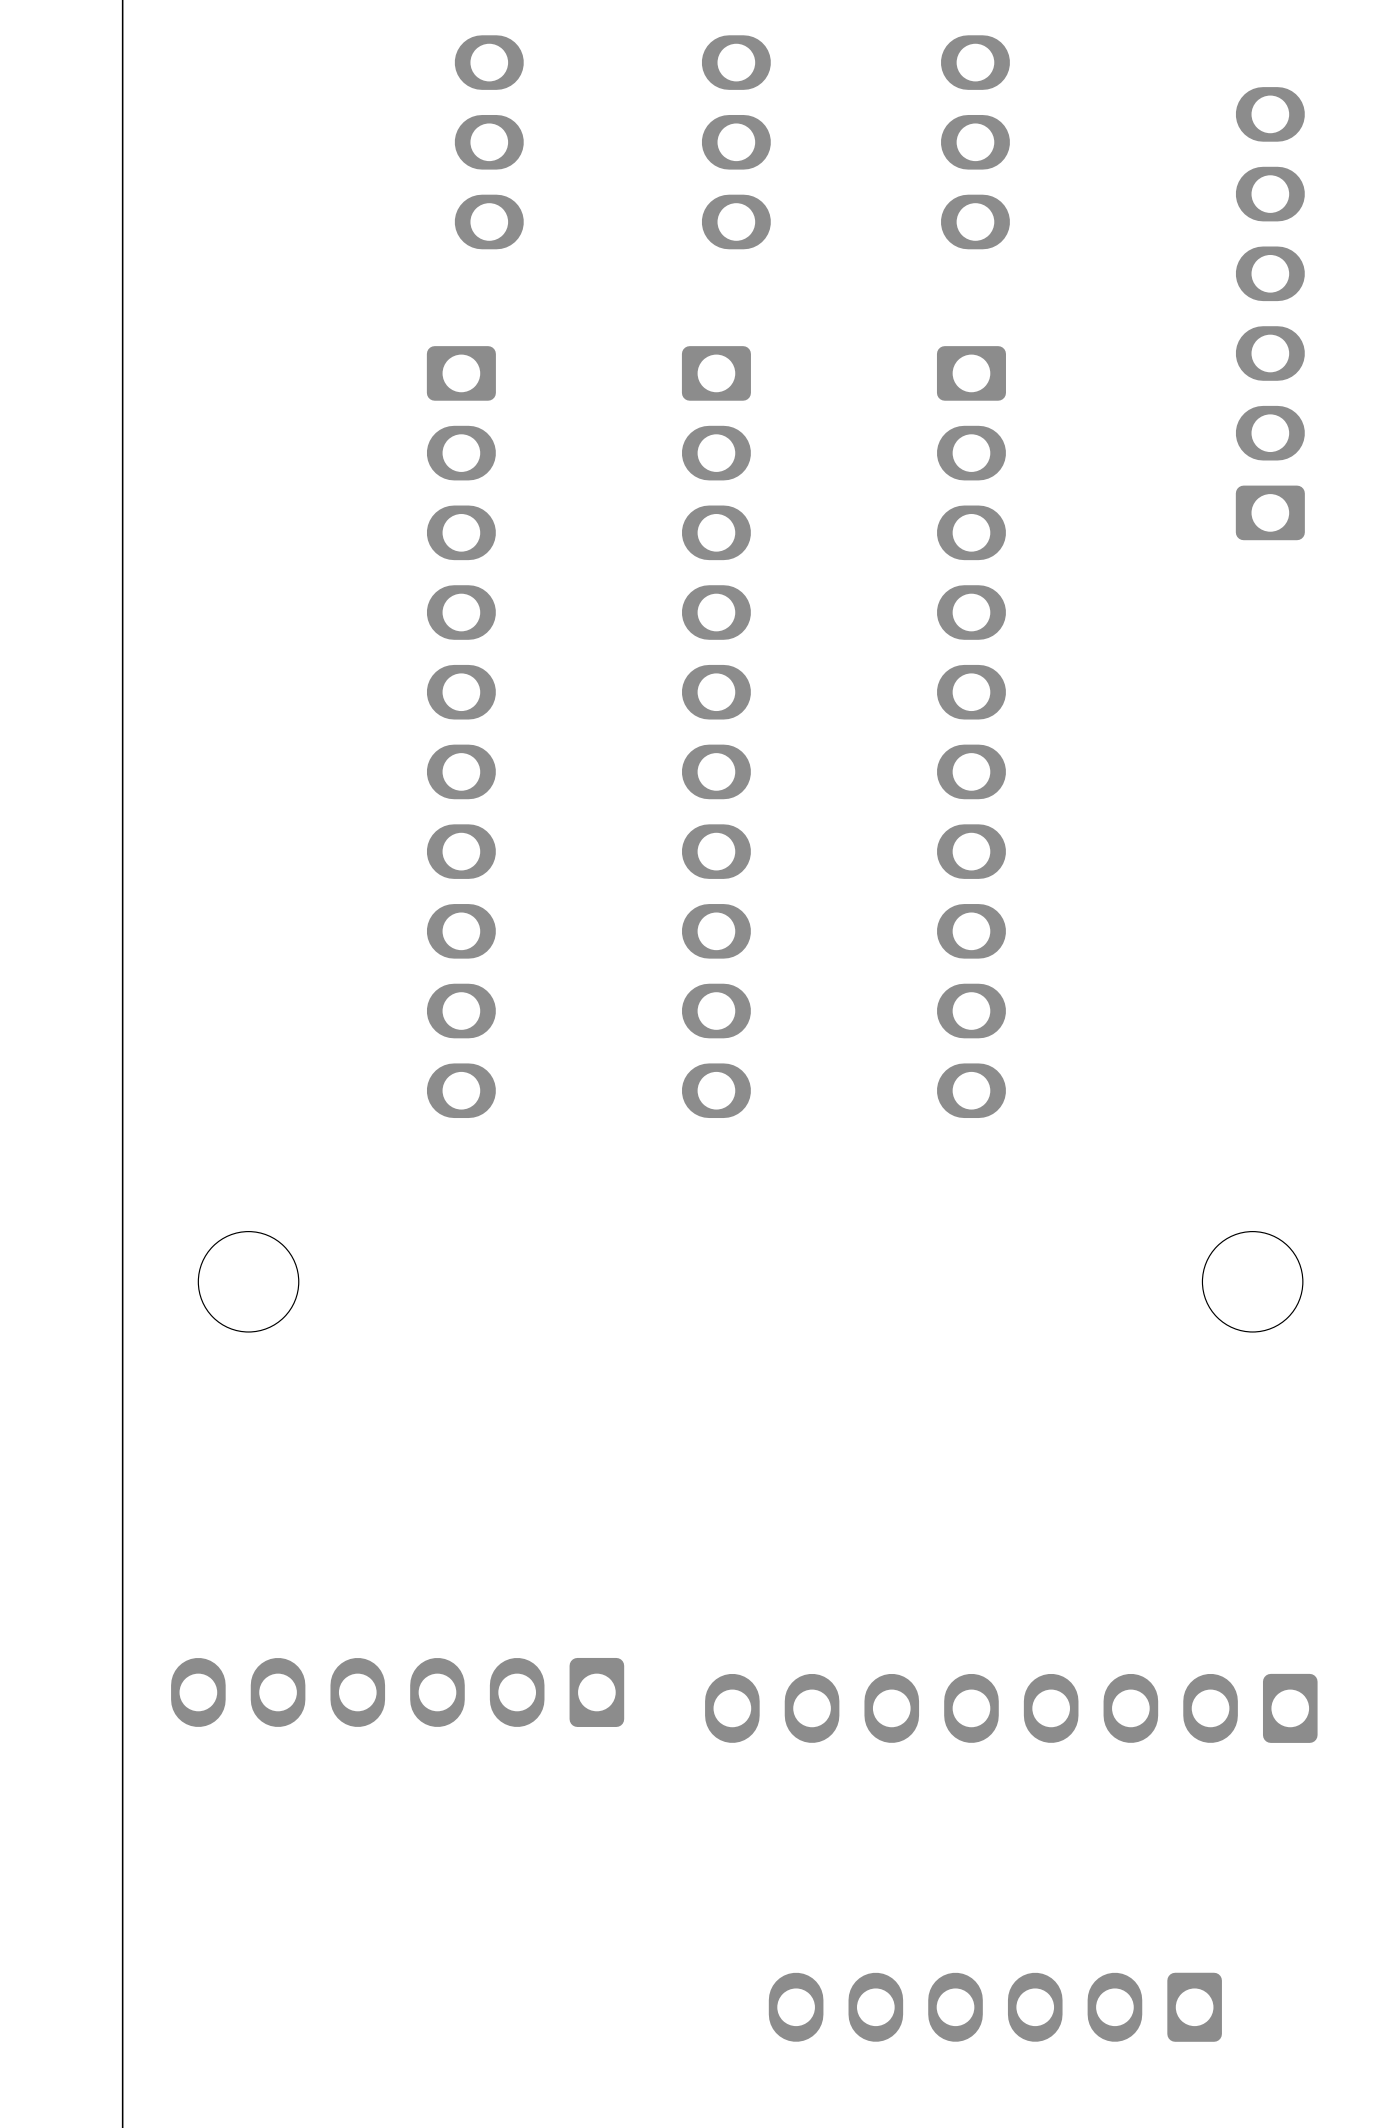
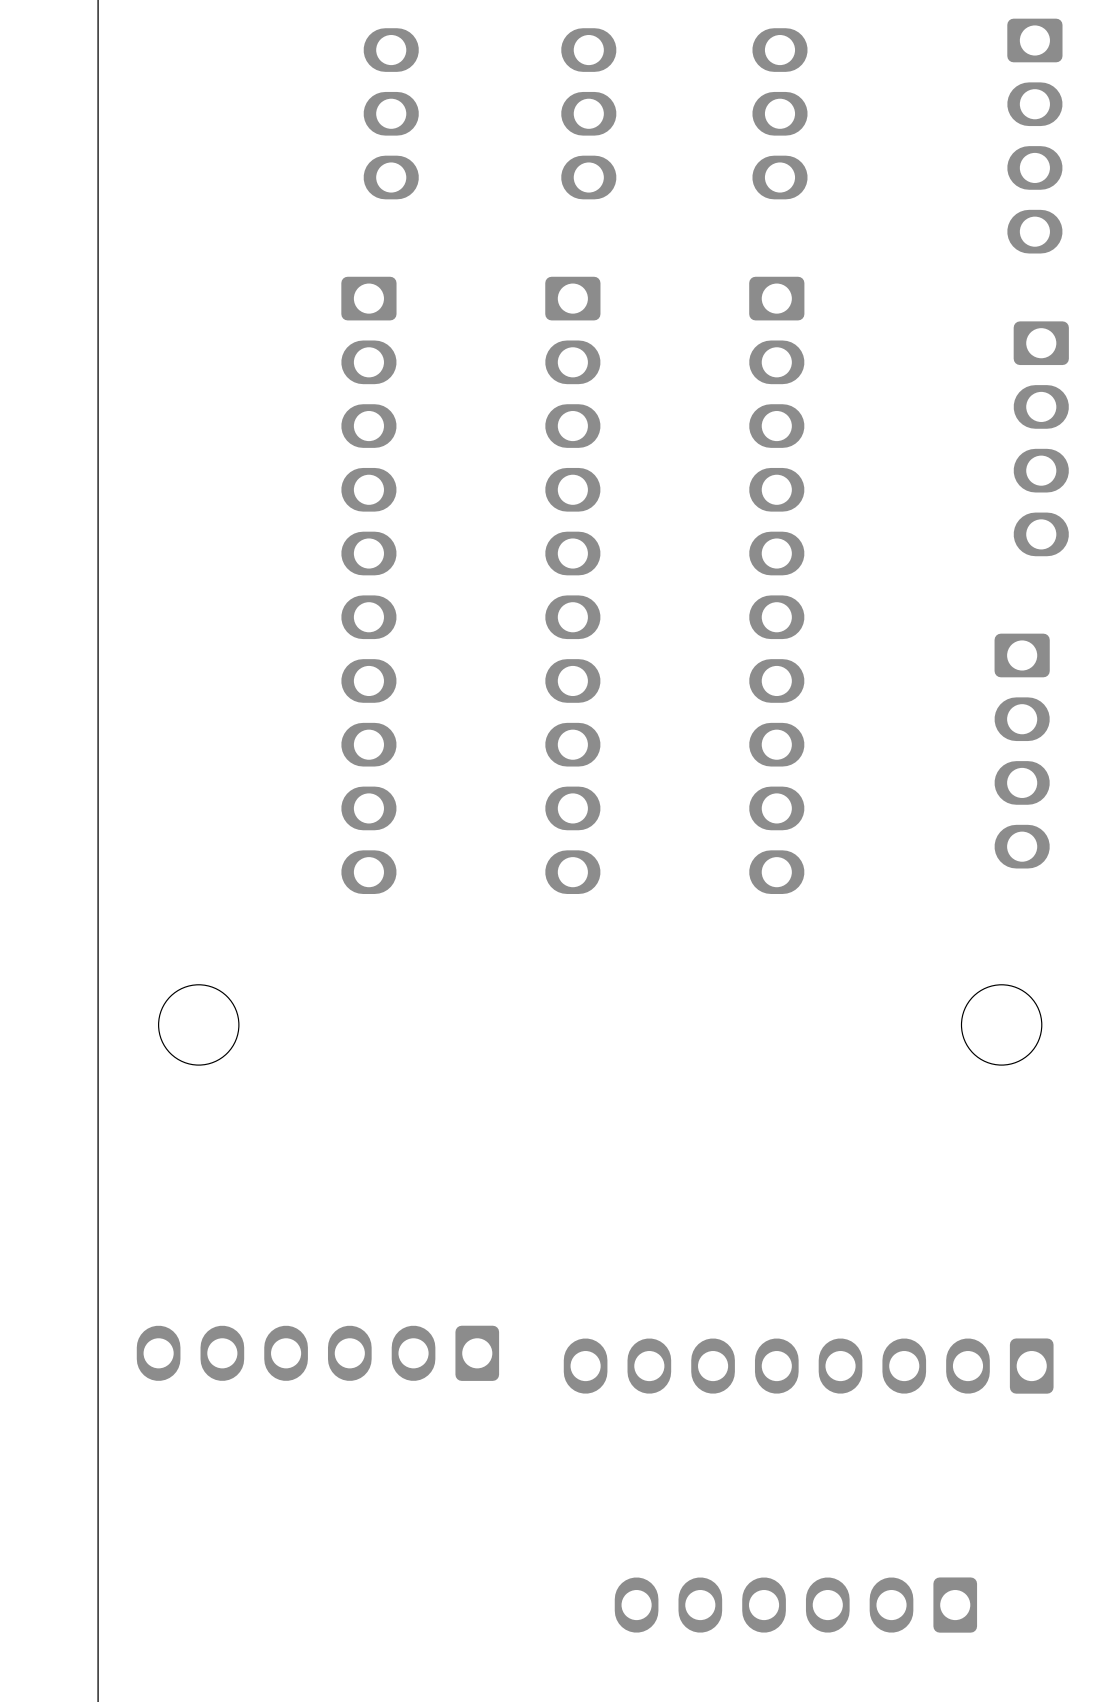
part: none -> (1034, 136)
part: (1270, 313) -> none
part: none -> (1041, 438)
part: none -> (1022, 751)

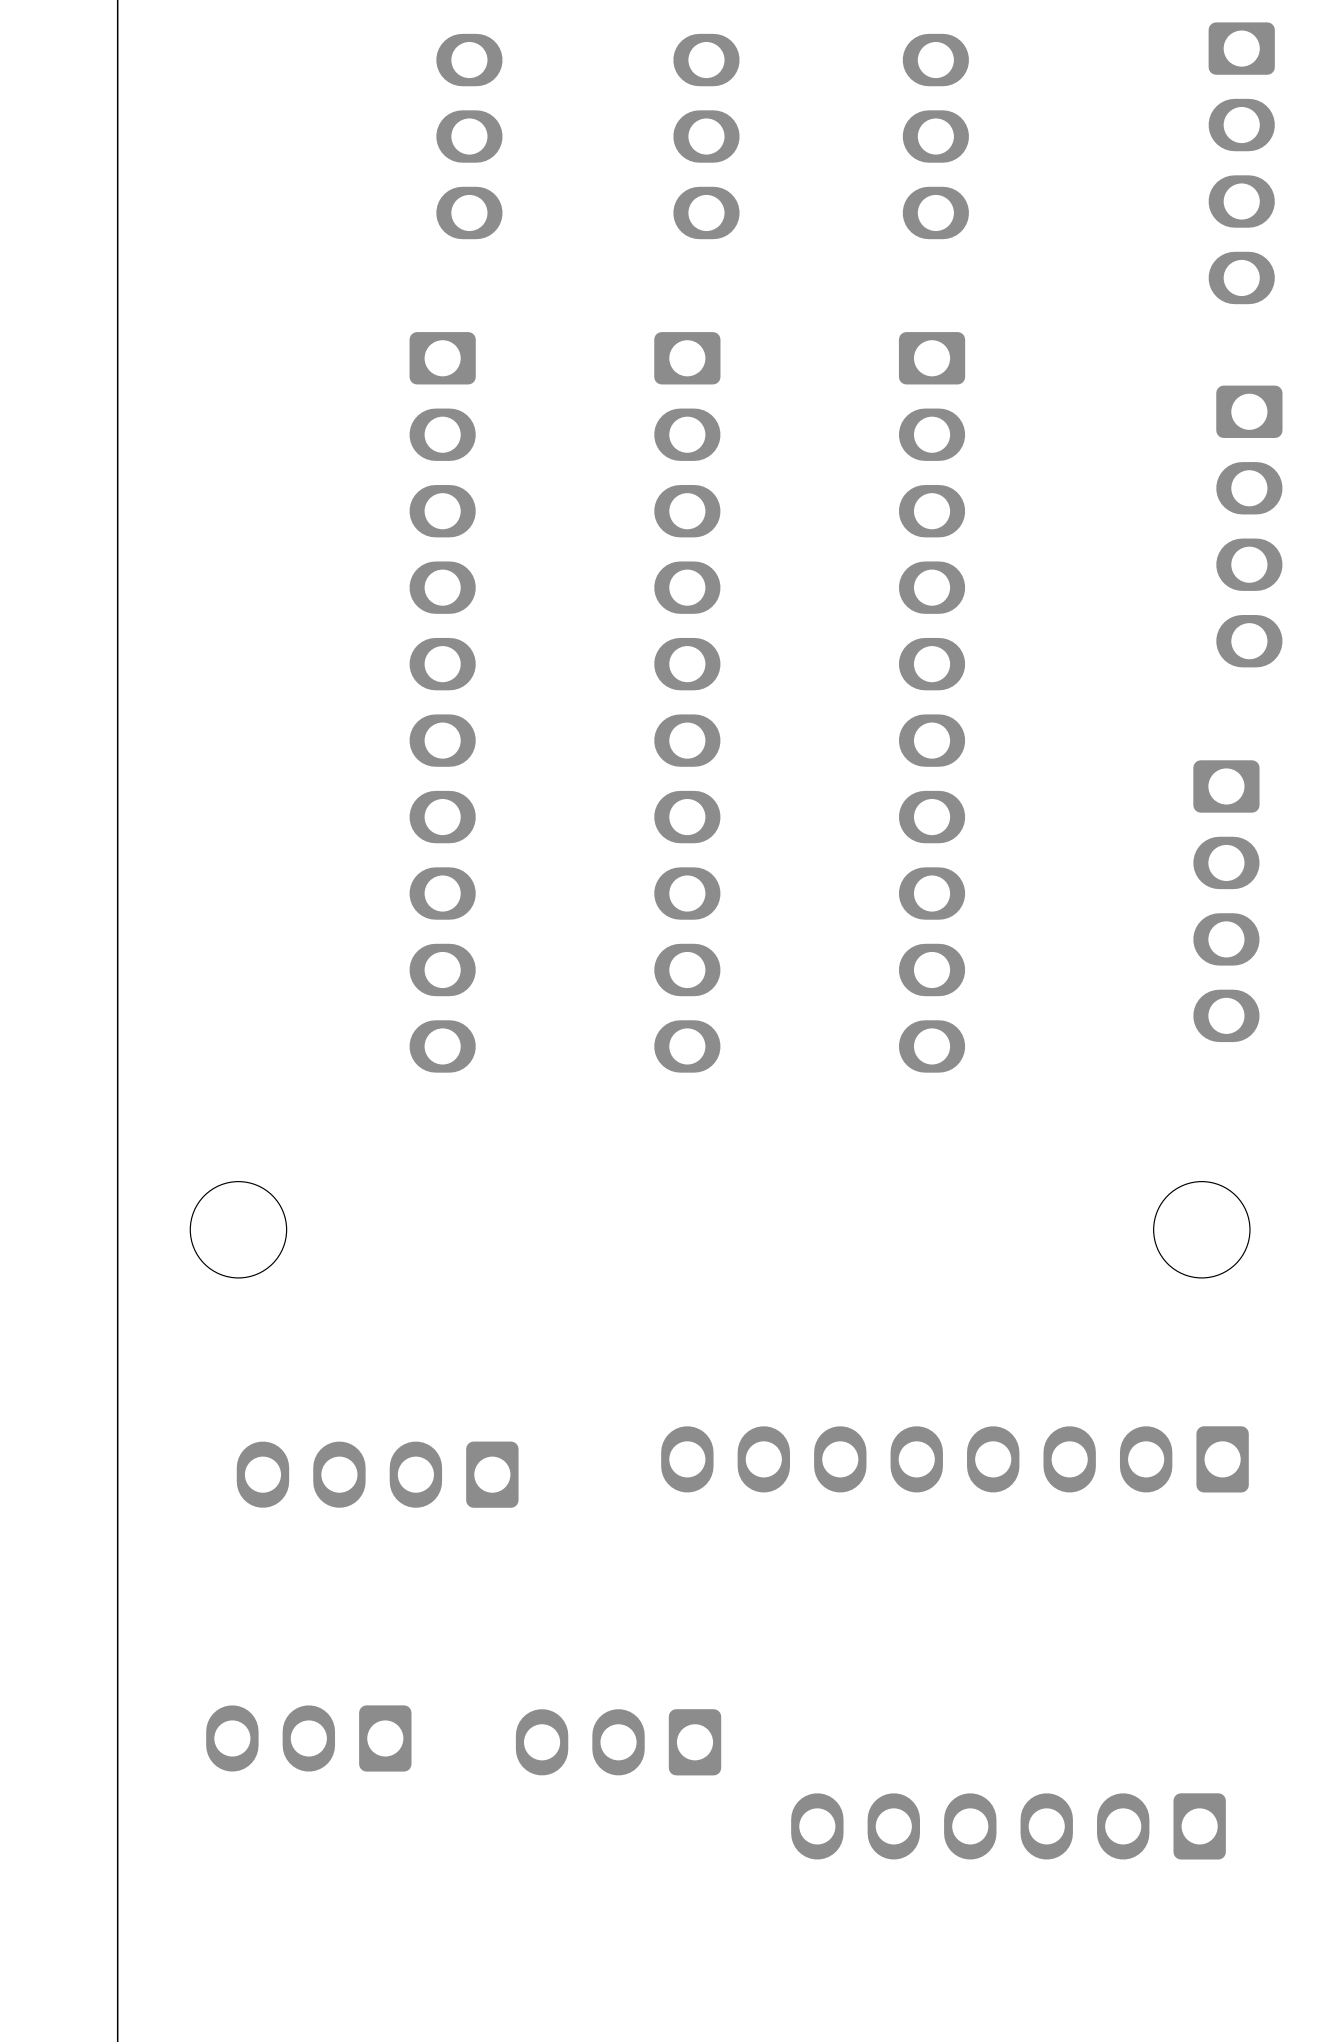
part: none -> (377, 1474)
part: (317, 1353) -> none
part position: (808, 1366) -> (954, 1459)
part: none -> (308, 1738)
part: none -> (618, 1742)
part position: (795, 1605) -> (1008, 1826)

